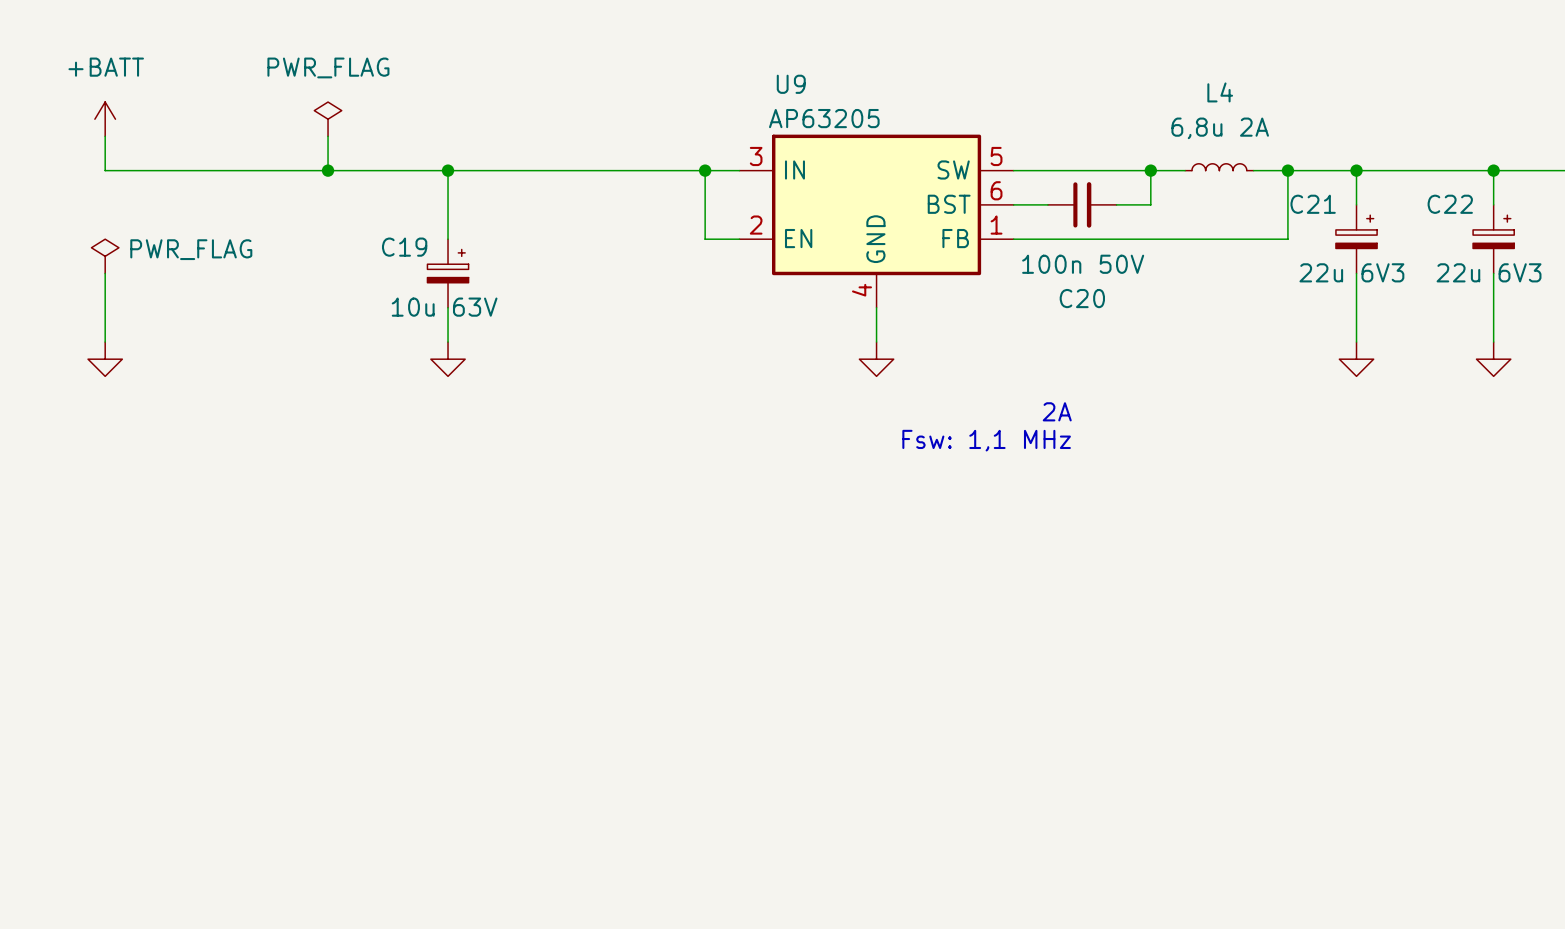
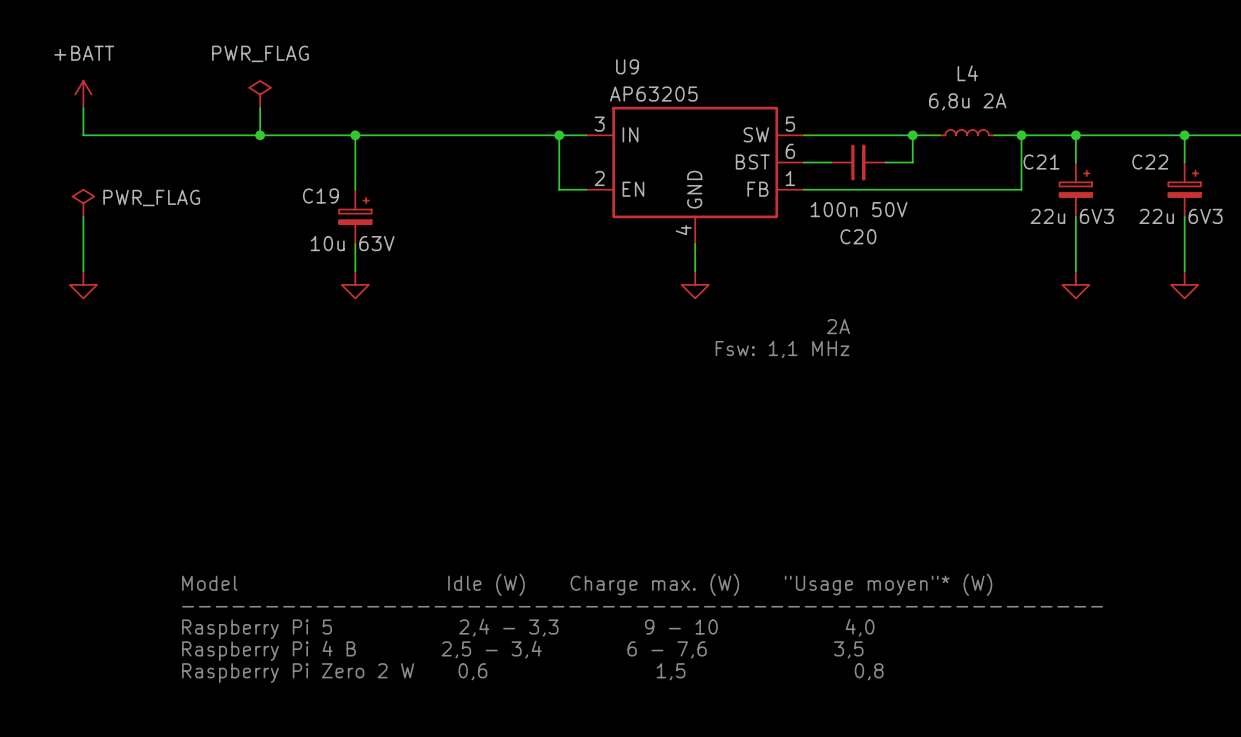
text: none -> Model Idle (W) Charge max. (W) "Usage moyen"* (W) (587, 584)
text: none -> ------------------------------------------------------- (642, 606)
text: none -> Raspberry Pi 5 2,4 - 3,3 9 - 10 4,0 (528, 628)
text: none -> Raspberry Pi 4 B 2,5 - 3,4 6 - 7,6 3,5 (522, 650)
text: none -> Raspberry Pi Zero 2 W 0,6 1,5 0,8 (532, 673)

